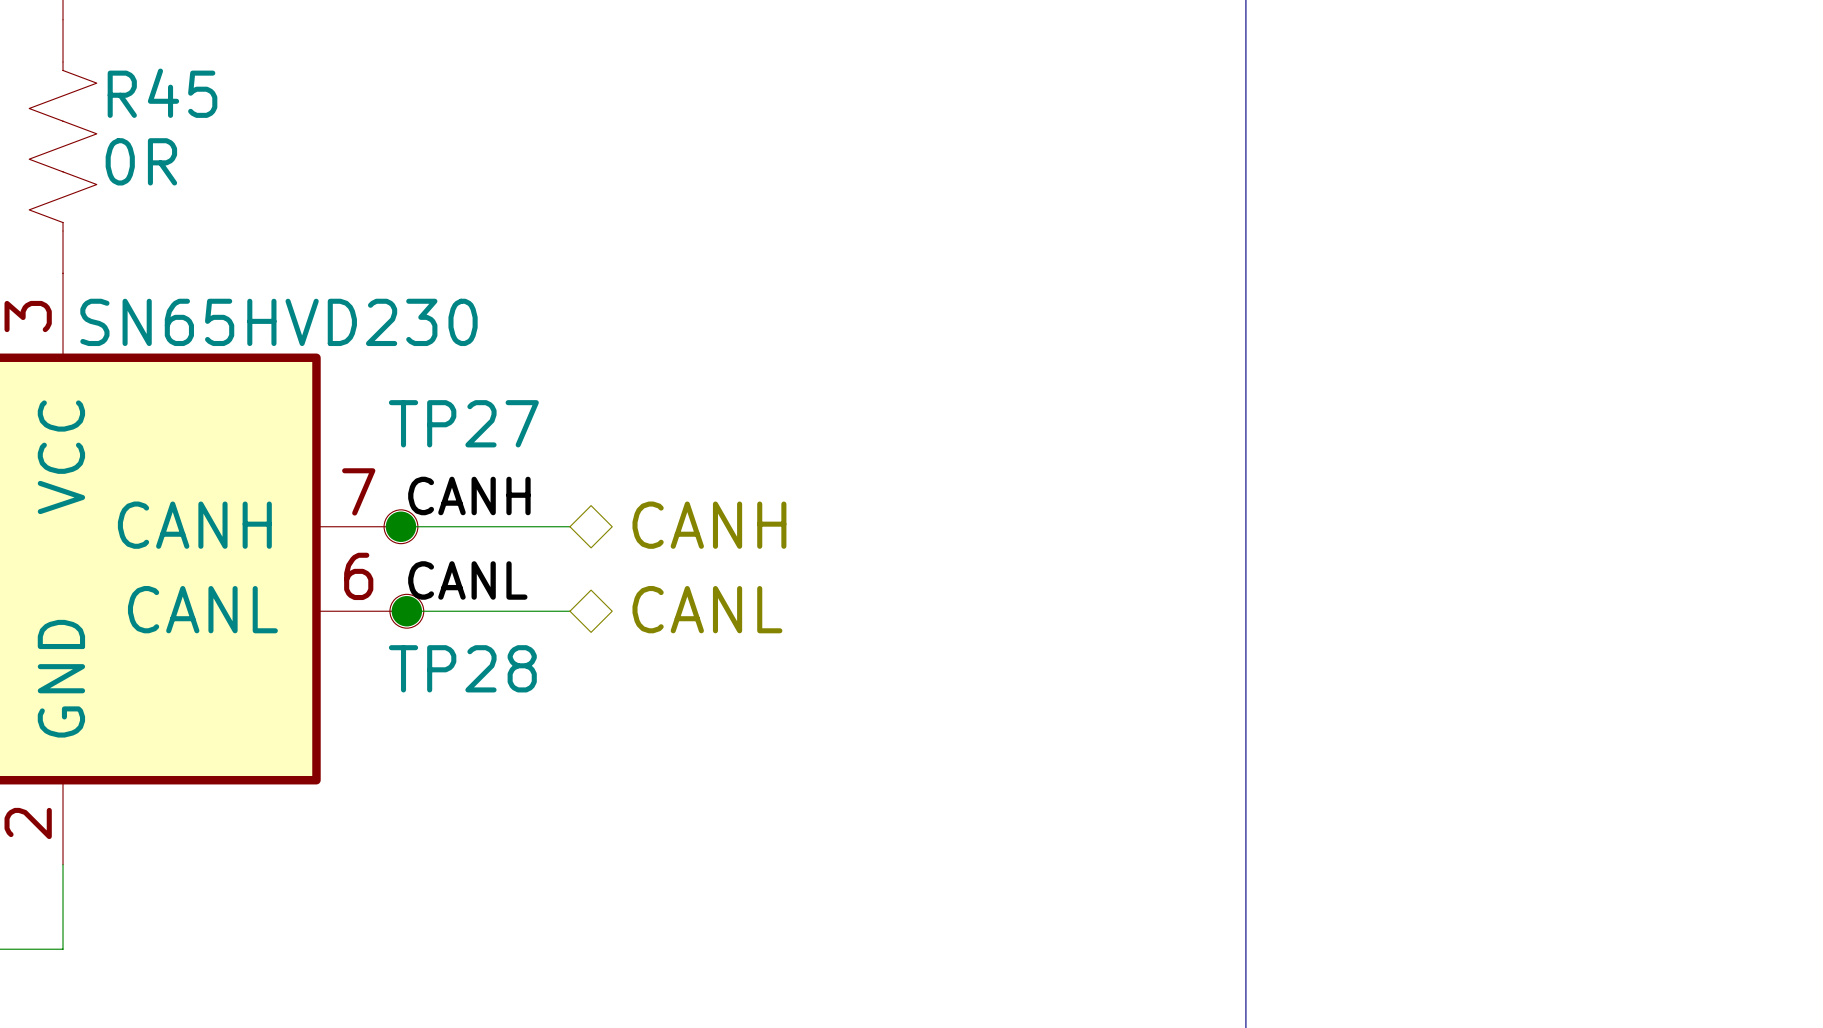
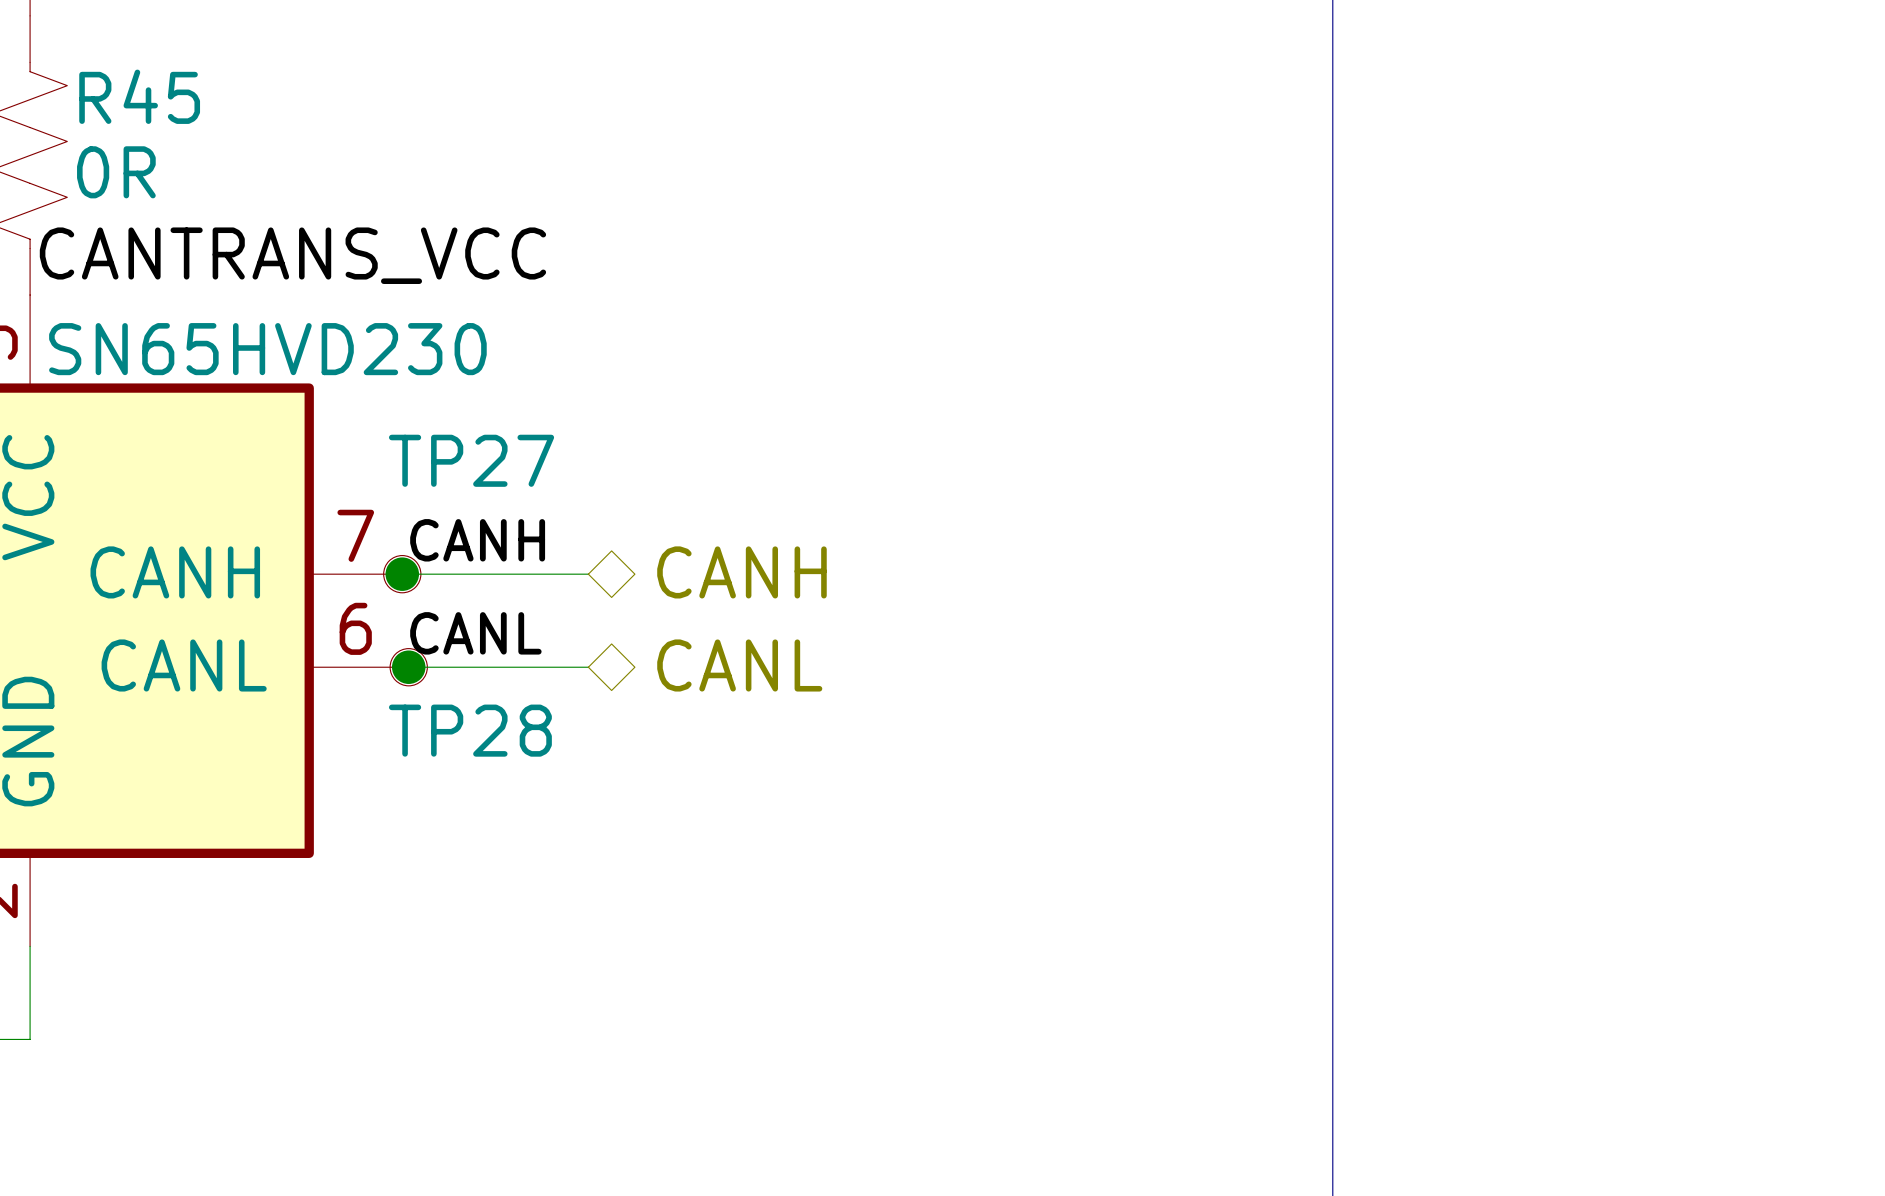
label: none -> CANTRANS_VCC (292, 255)

